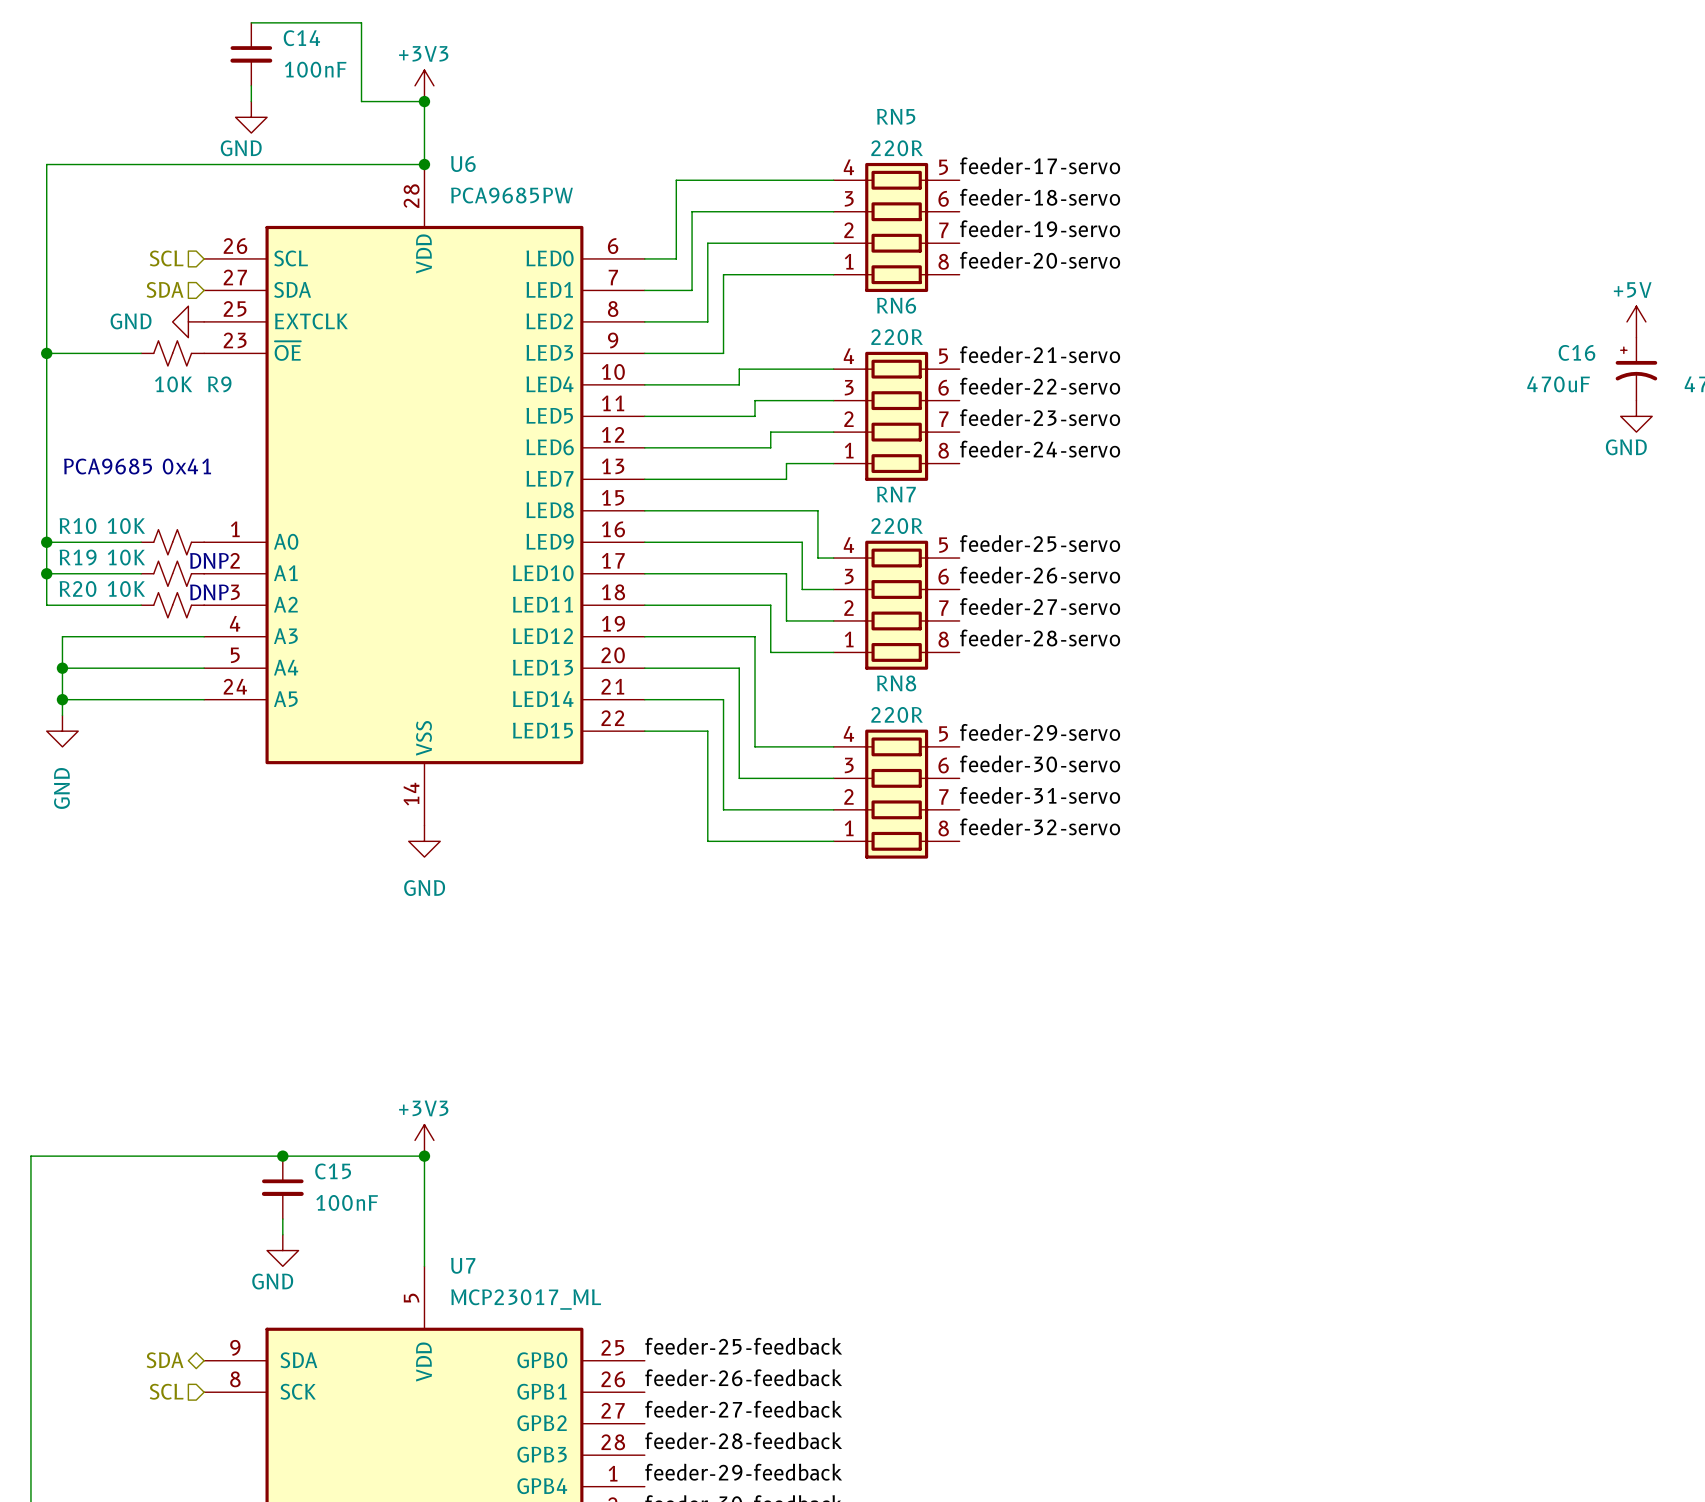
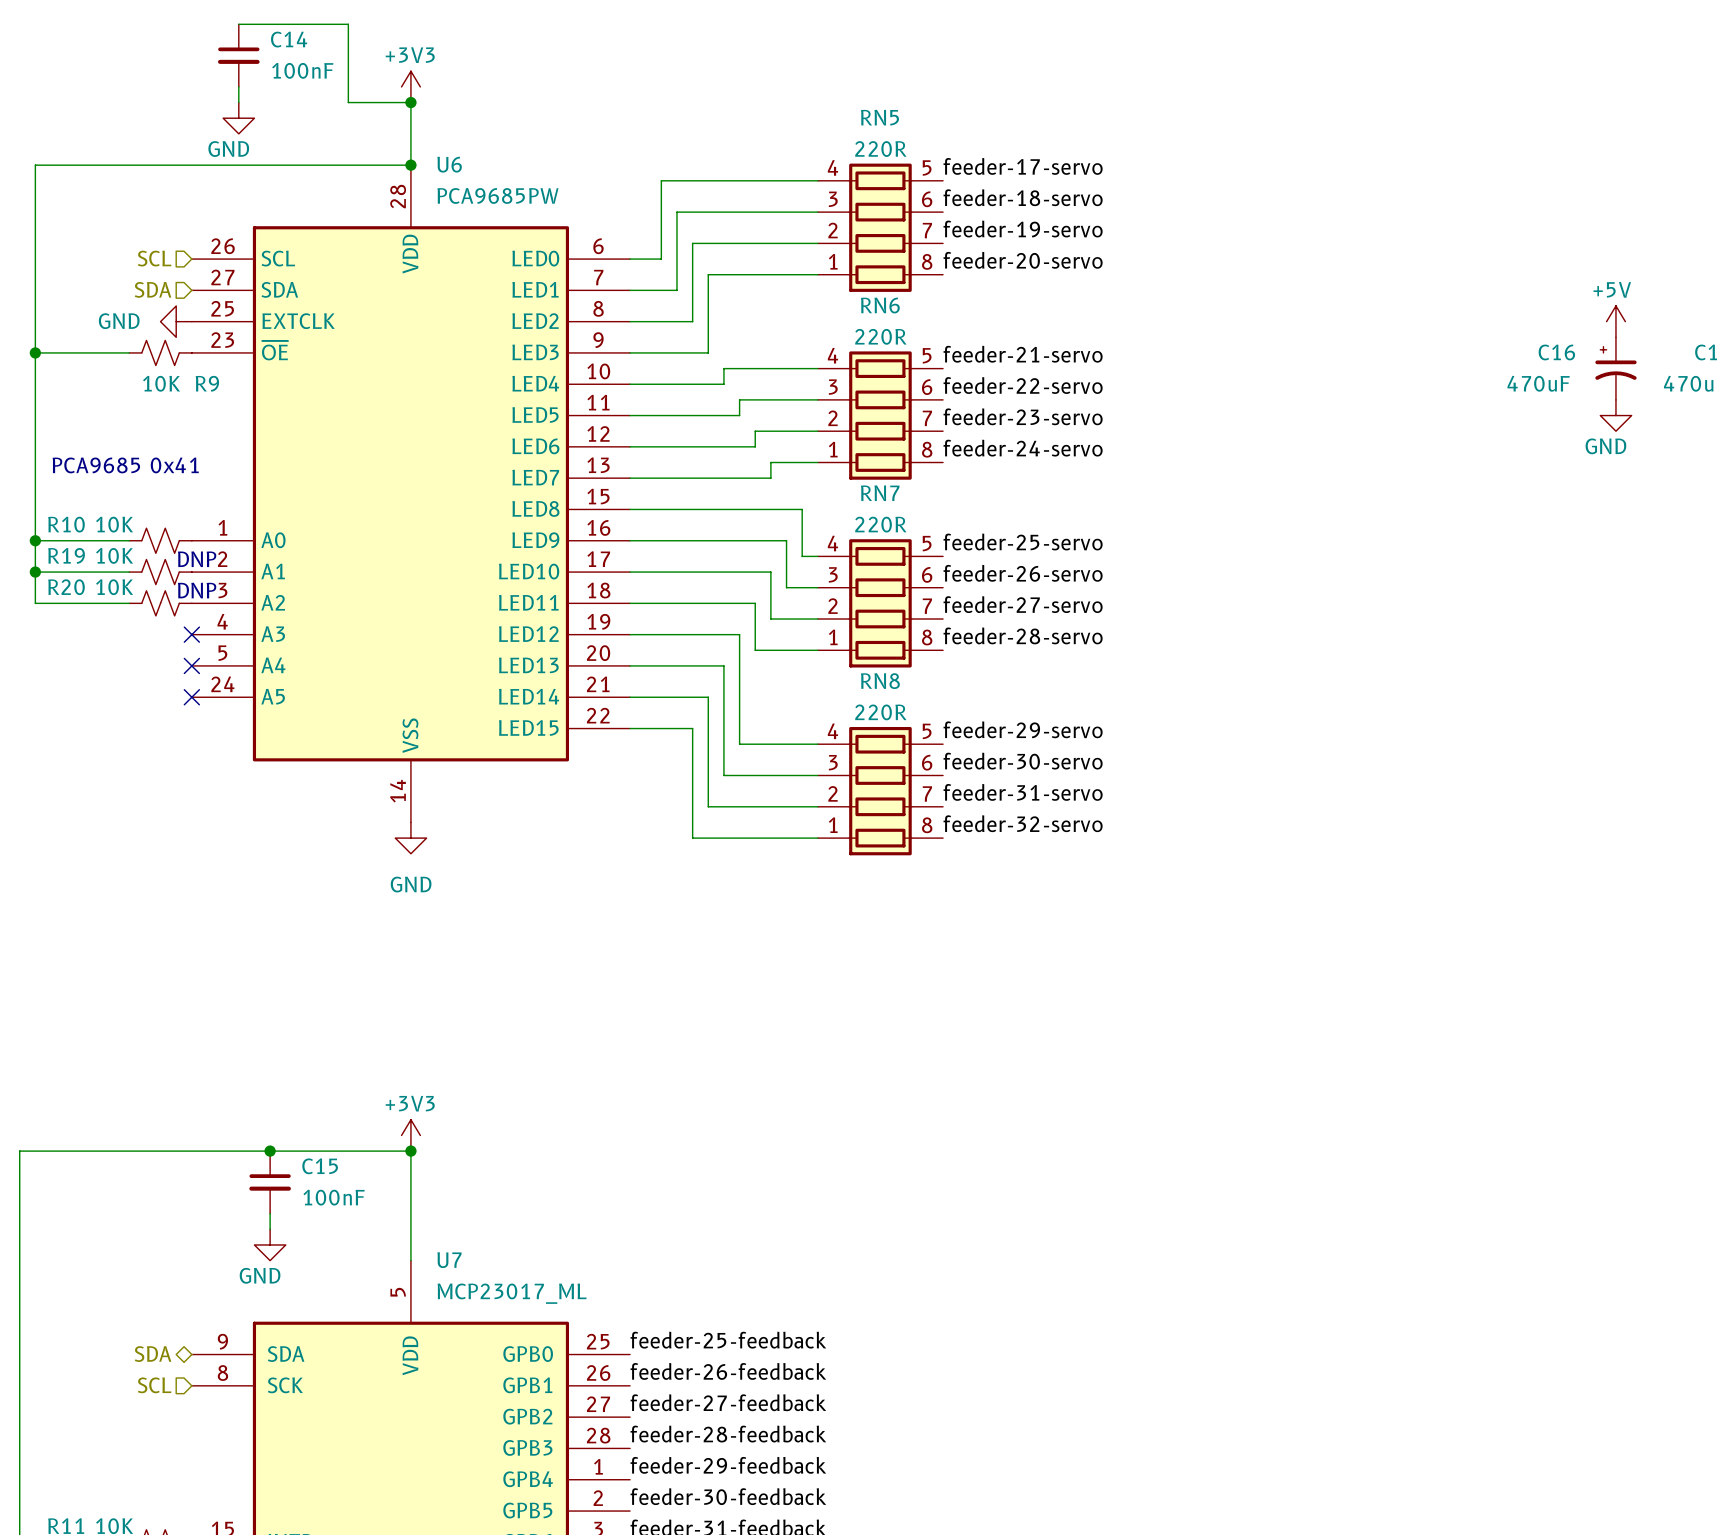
wire: (204, 636) (62, 636) (62, 715) -> none
no-connect mark: none -> (191, 634)
wire: (62, 668) (204, 668) -> none
junction: (62, 668) -> none
no-connect mark: none -> (191, 665)
wire: (62, 699) (204, 699) -> none
junction: (62, 699) -> none
no-connect mark: none -> (191, 697)
power symbol: GND (62, 731) -> none

